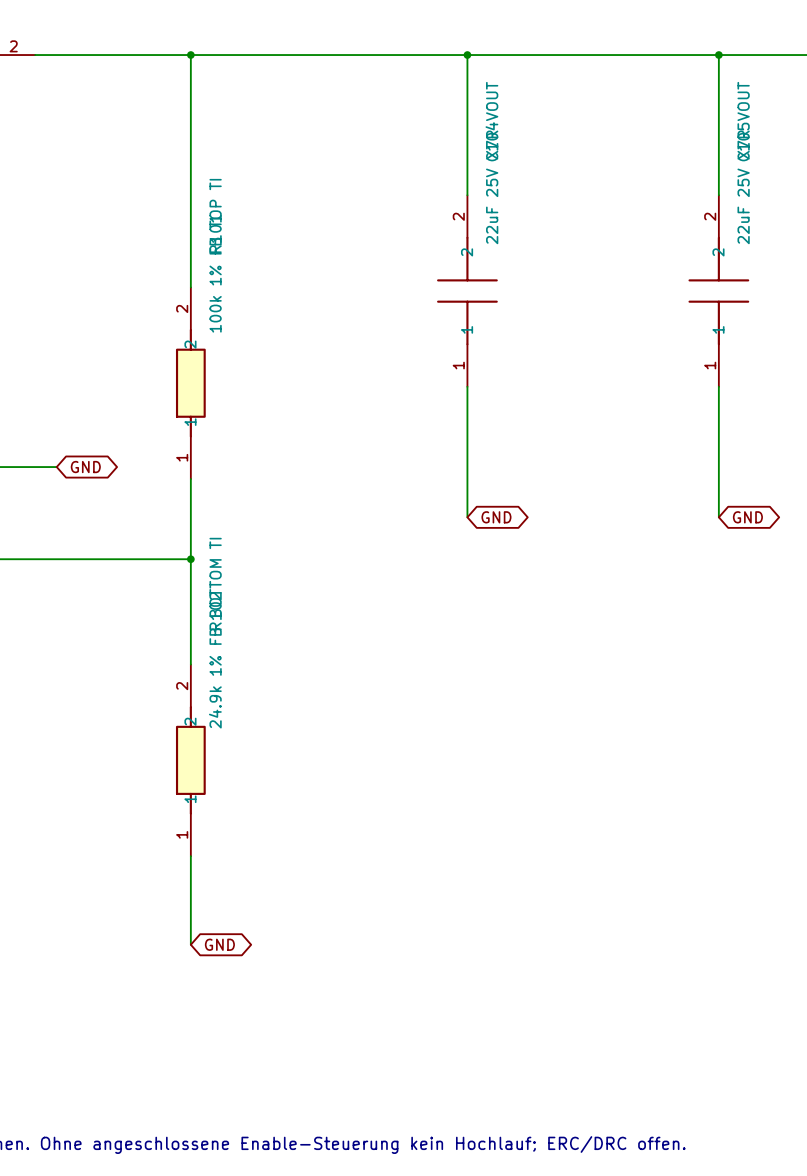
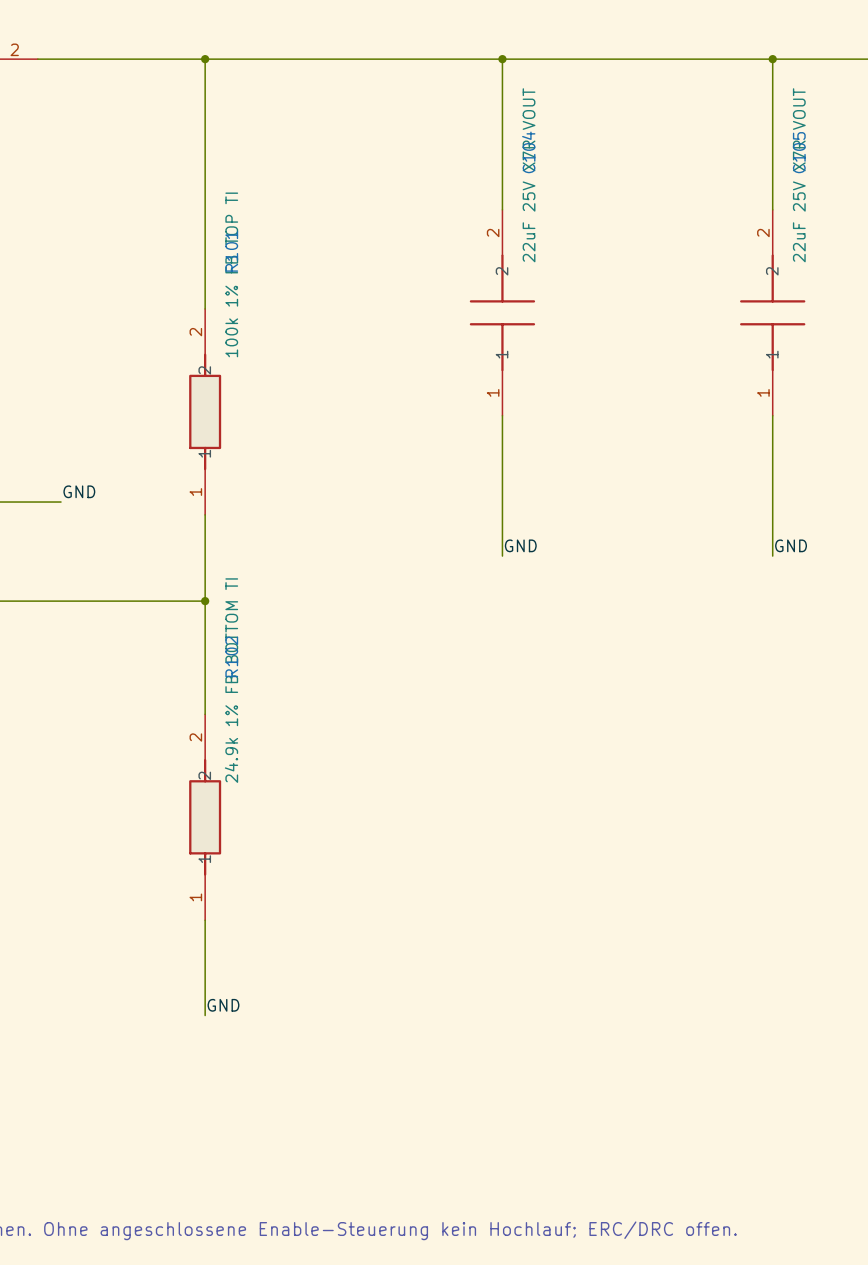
label: none -> GND (79, 491)
global label: GND (85, 467) -> none
label: none -> GND (520, 545)
label: none -> GND (791, 545)
global label: GND (496, 517) -> none
global label: GND (747, 517) -> none
label: none -> GND (223, 1005)
global label: GND (219, 944) -> none

